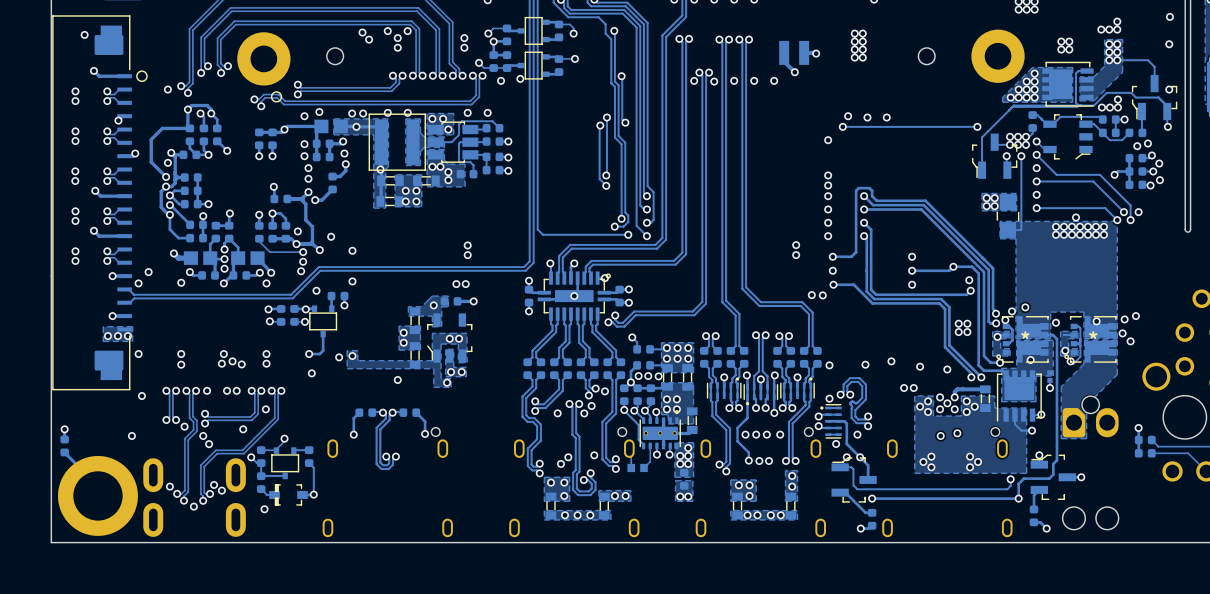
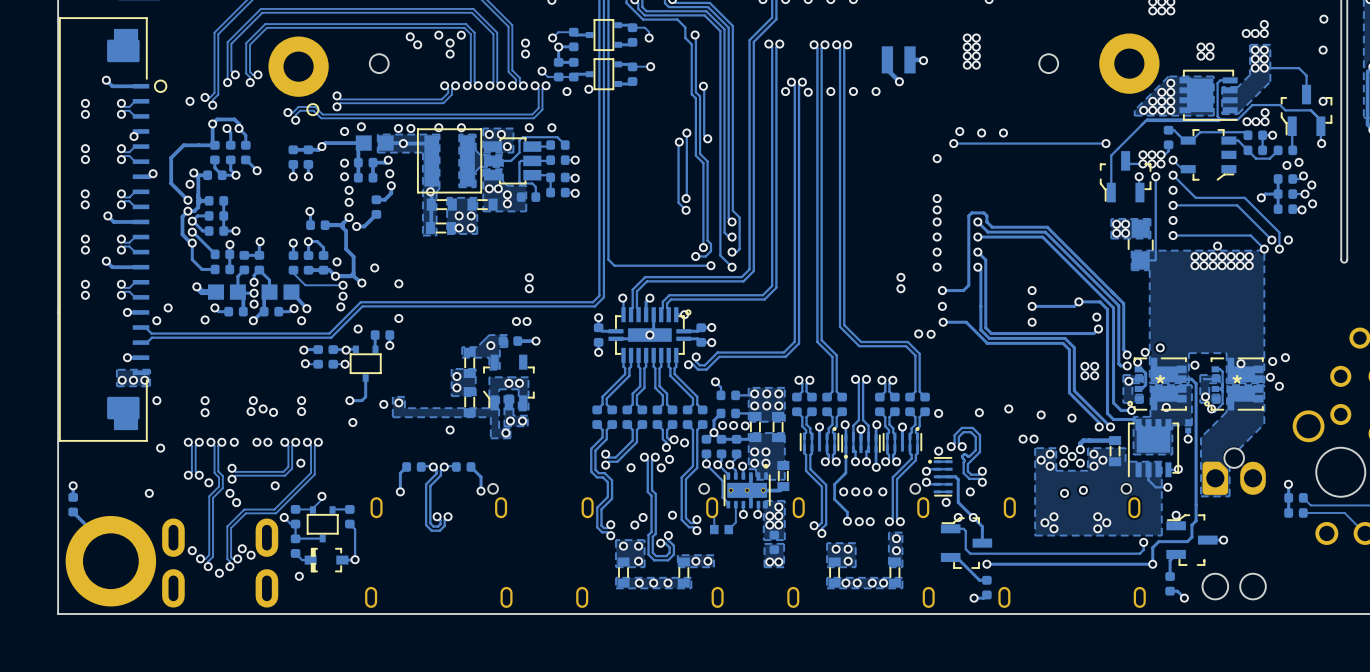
via: (84, 34) -> none

